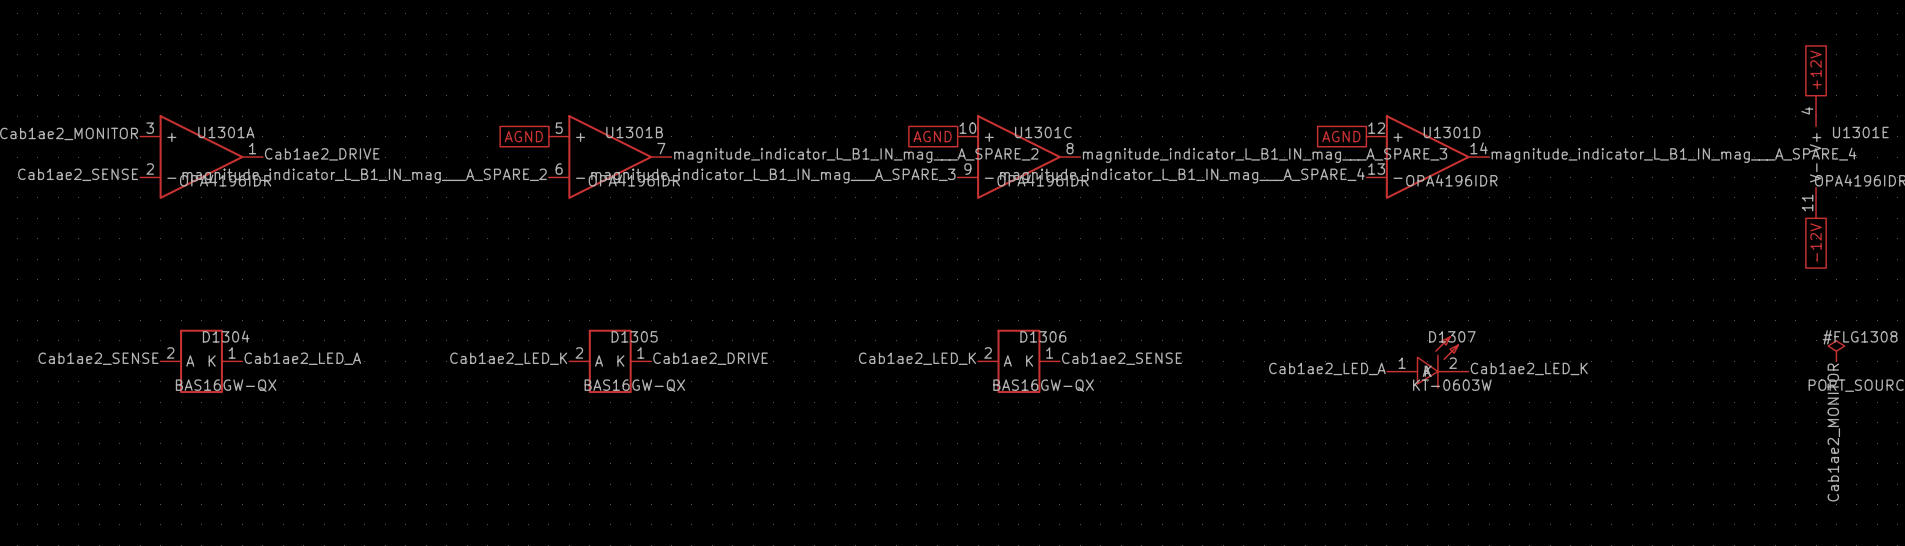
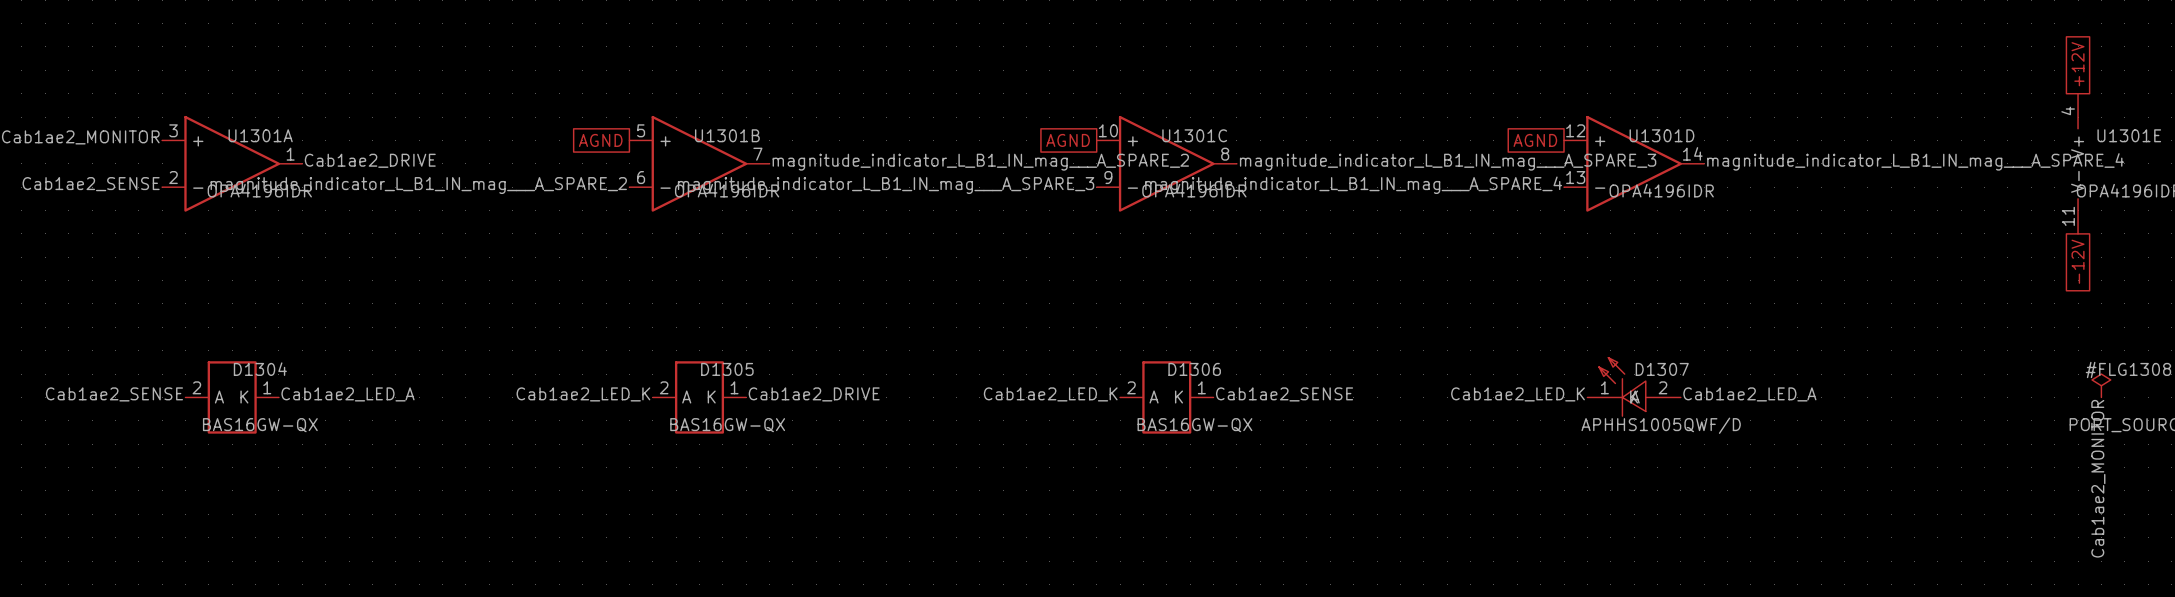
D1307 symbol: [1386, 336, 1469, 388] -> [1587, 357, 1681, 417]
label position: Cab1ae2_LED_A (1327, 368) -> Cab1ae2_LED_A (1749, 394)
label position: Cab1ae2_LED_K (1529, 368) -> Cab1ae2_LED_K (1518, 394)
D1307 value: KT-0603W (1452, 385) -> APHHS1005QWF/D (1661, 425)

